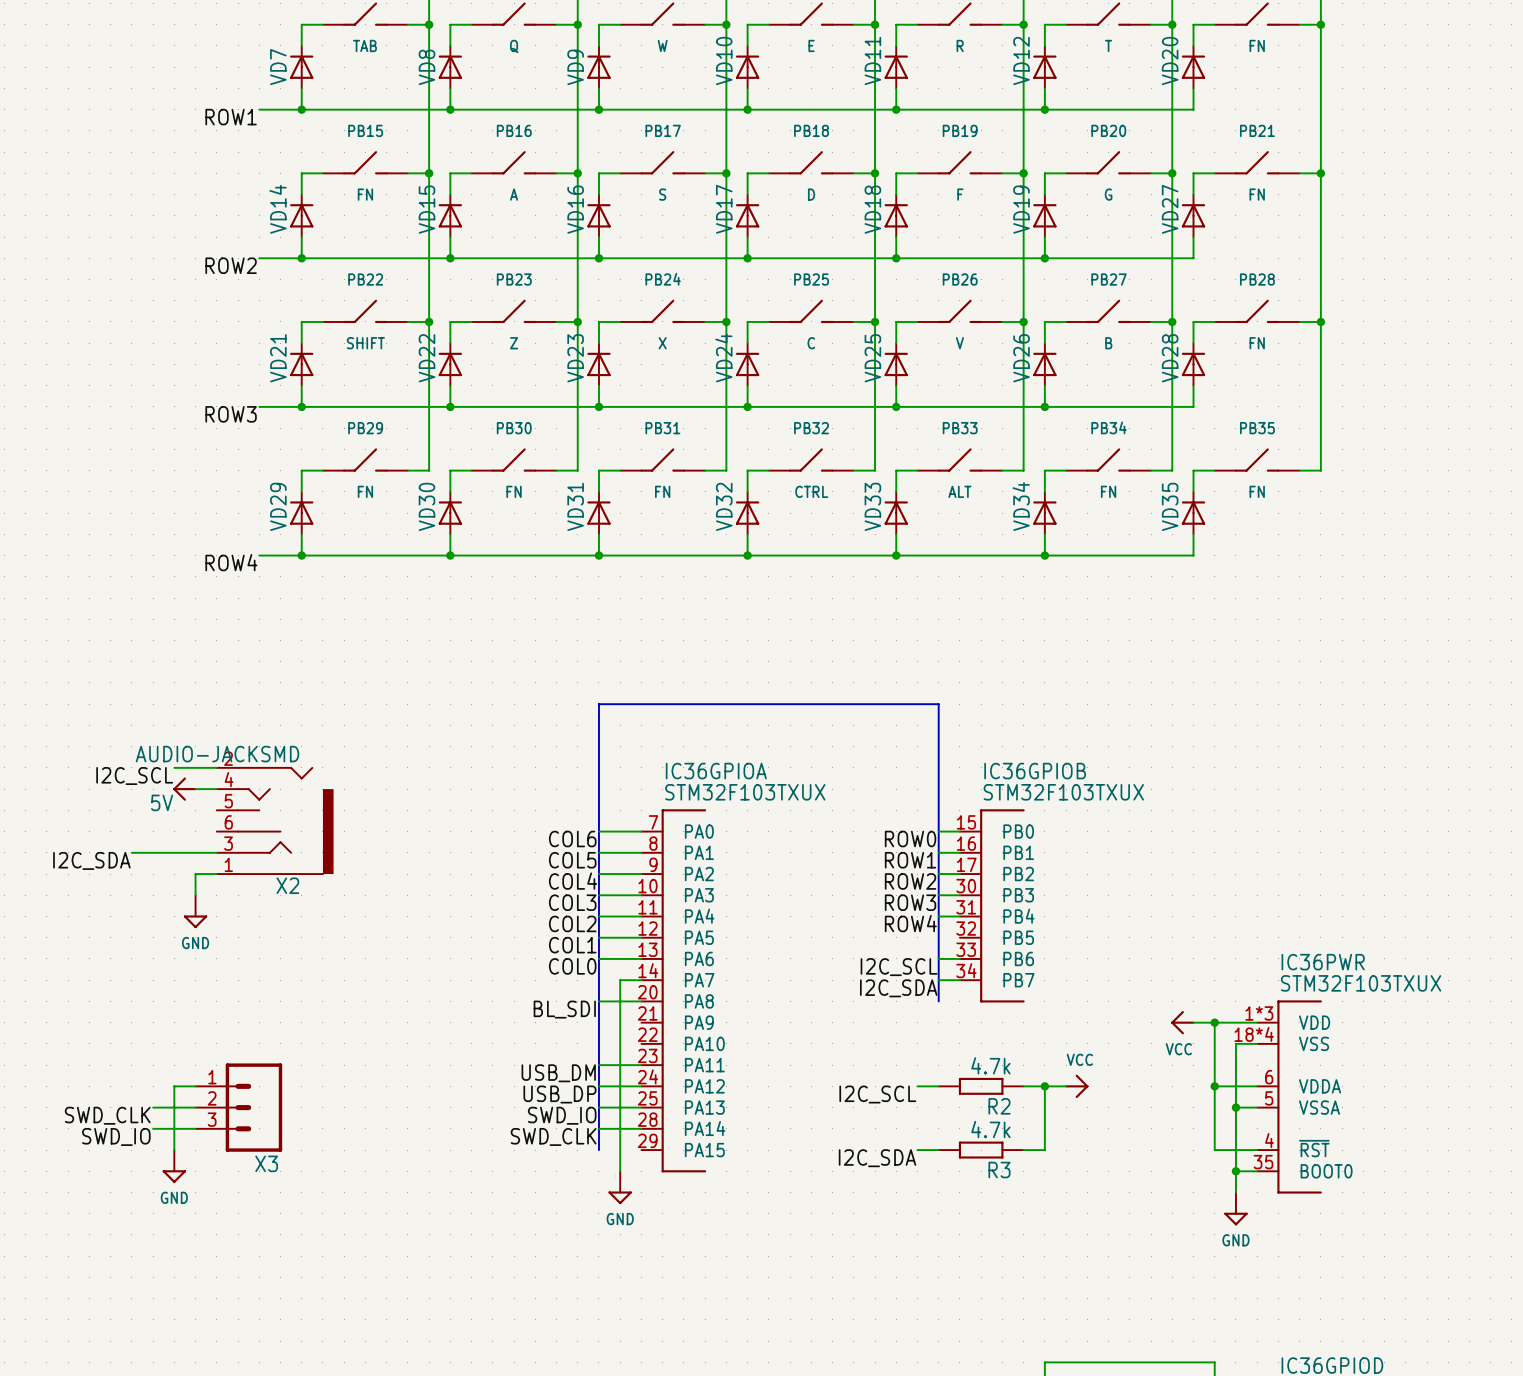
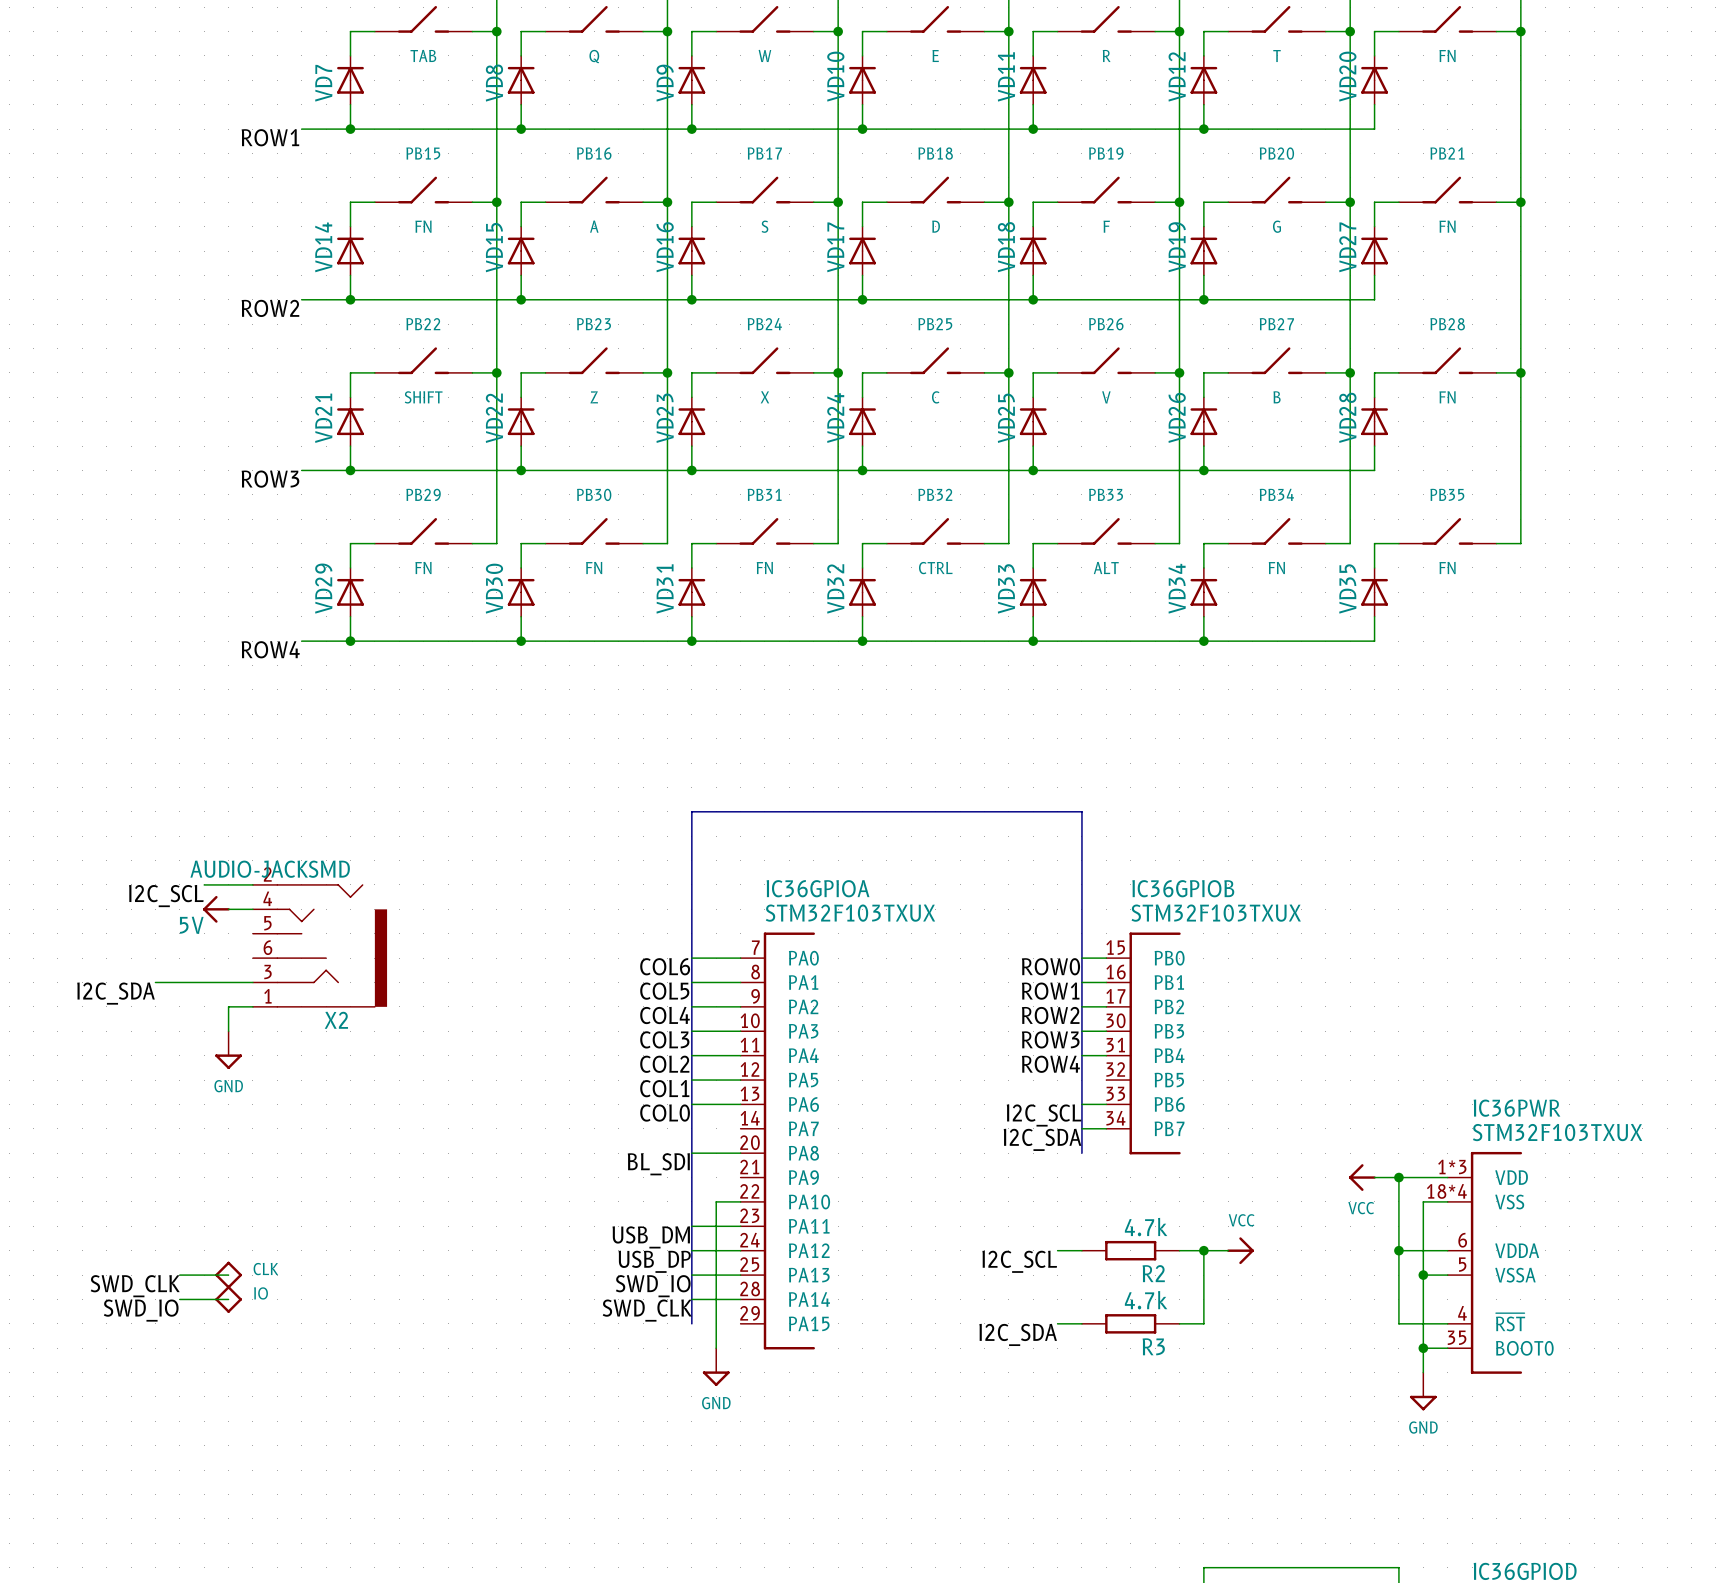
wire: (641, 980) (620, 980) (620, 1043) -> (740, 1201) (716, 1201)
wire: (195, 1086) (174, 1086) (174, 1150) -> none
part: none -> CLK (228, 1275)
X3: (238, 1107) -> none
part: none -> IO (228, 1299)
power symbol: GND (174, 1166) -> none

